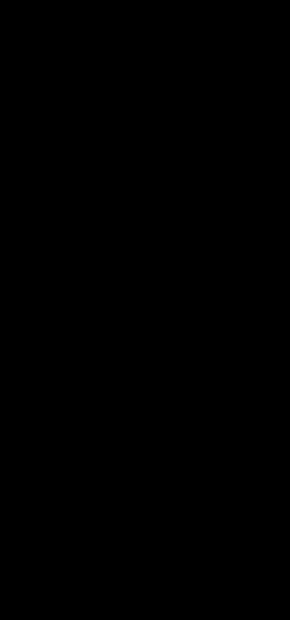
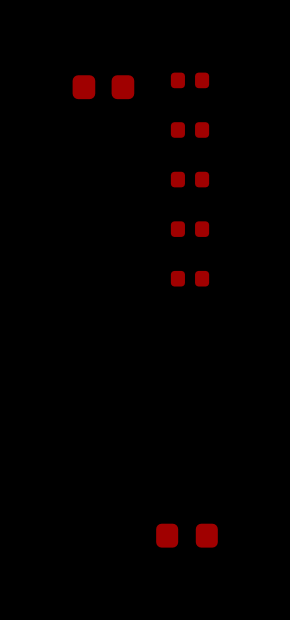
part: none -> (190, 80)
part: none -> (103, 87)
part: none -> (190, 129)
part: none -> (190, 179)
part: none -> (190, 229)
part: none -> (190, 278)
part: none -> (186, 535)

